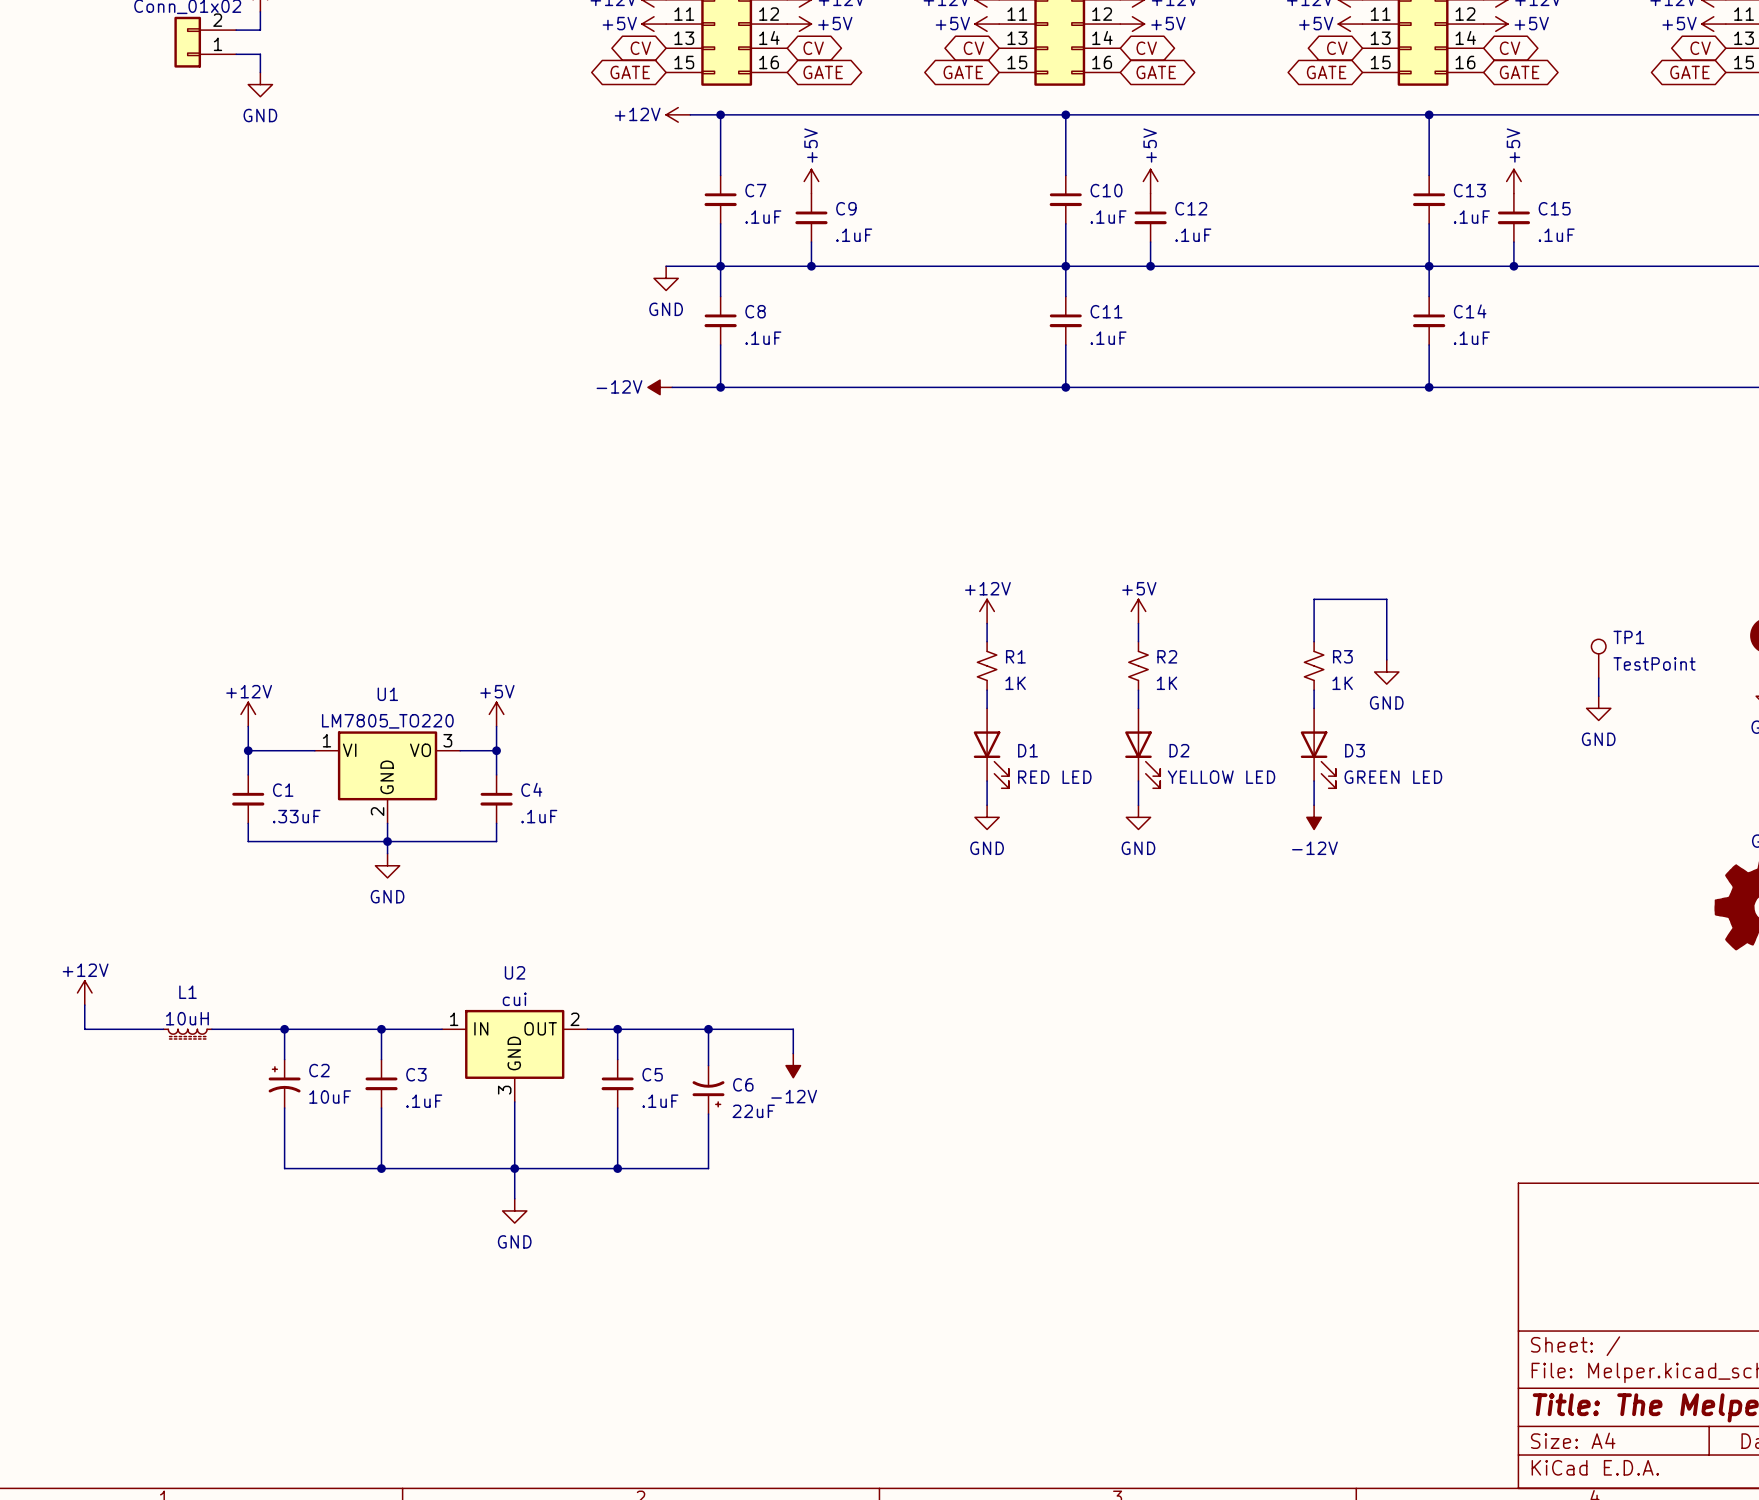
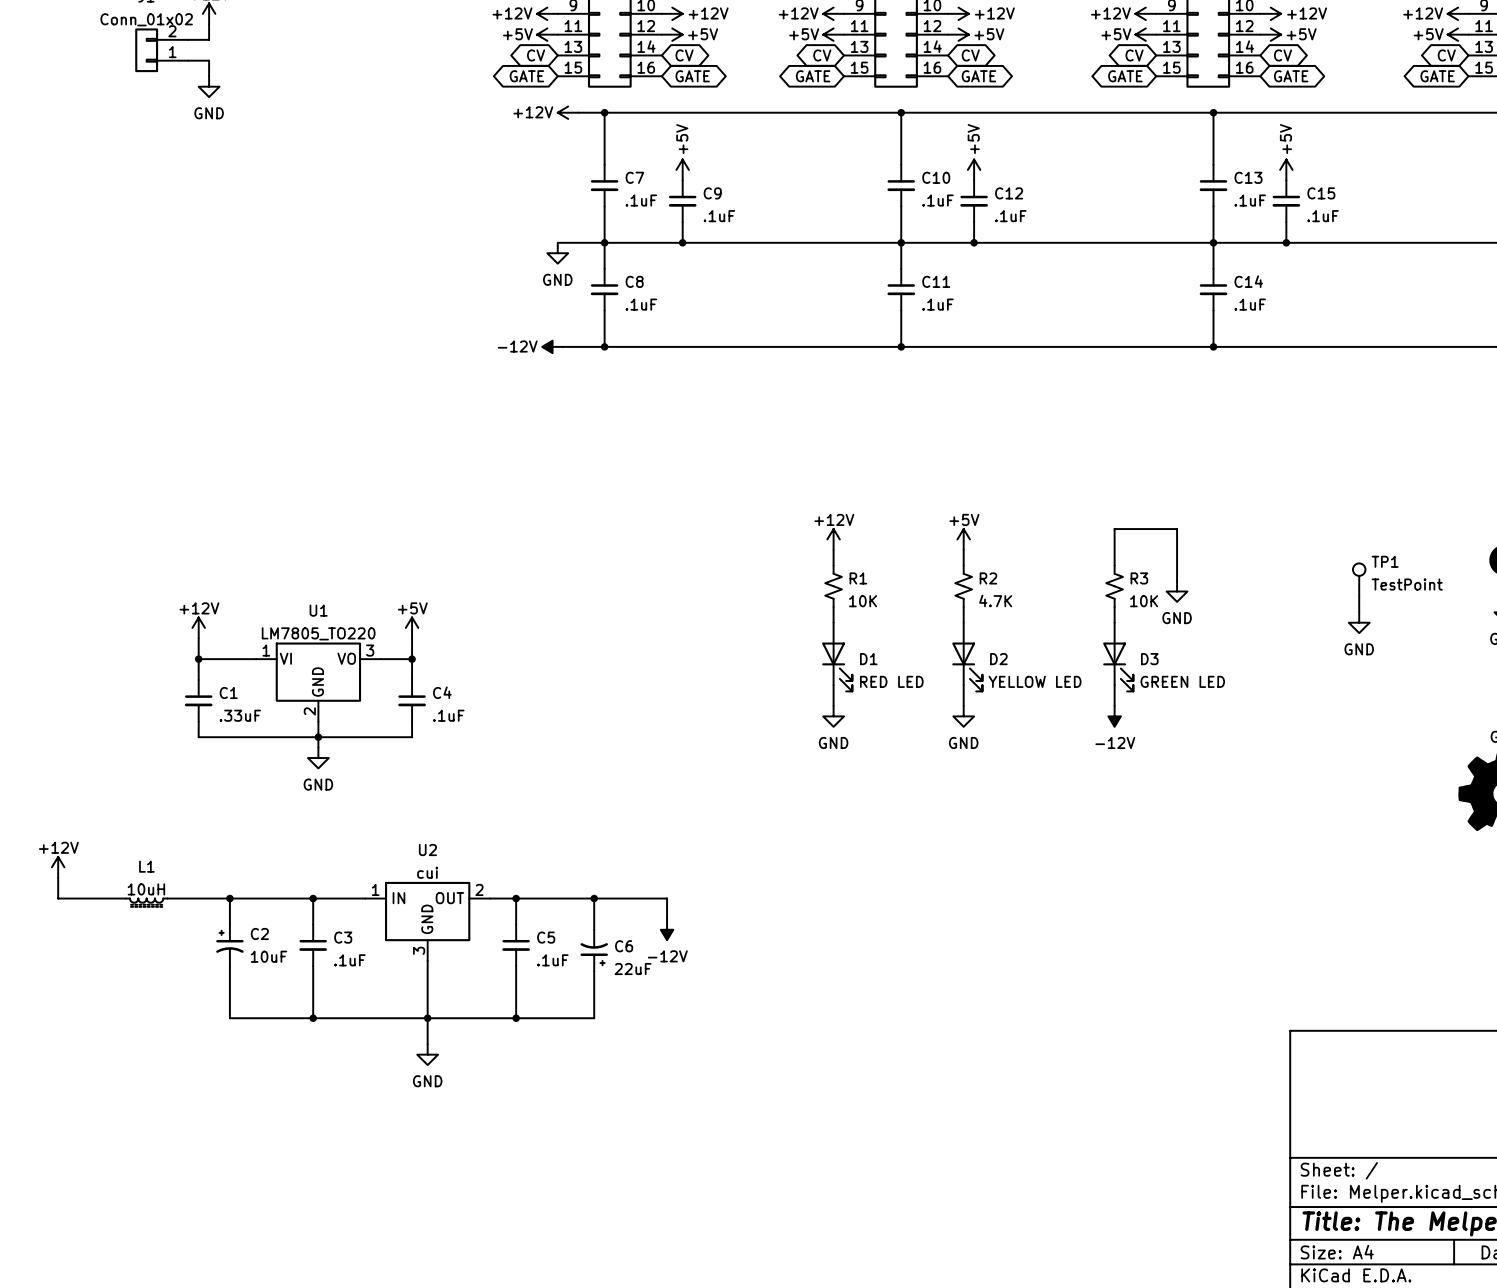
R1 value: 1K (1015, 683) -> 10K (863, 601)
R2 value: 1K (1166, 683) -> 4.7K (995, 600)
R3 value: 1K (1342, 683) -> 10K (1144, 601)

